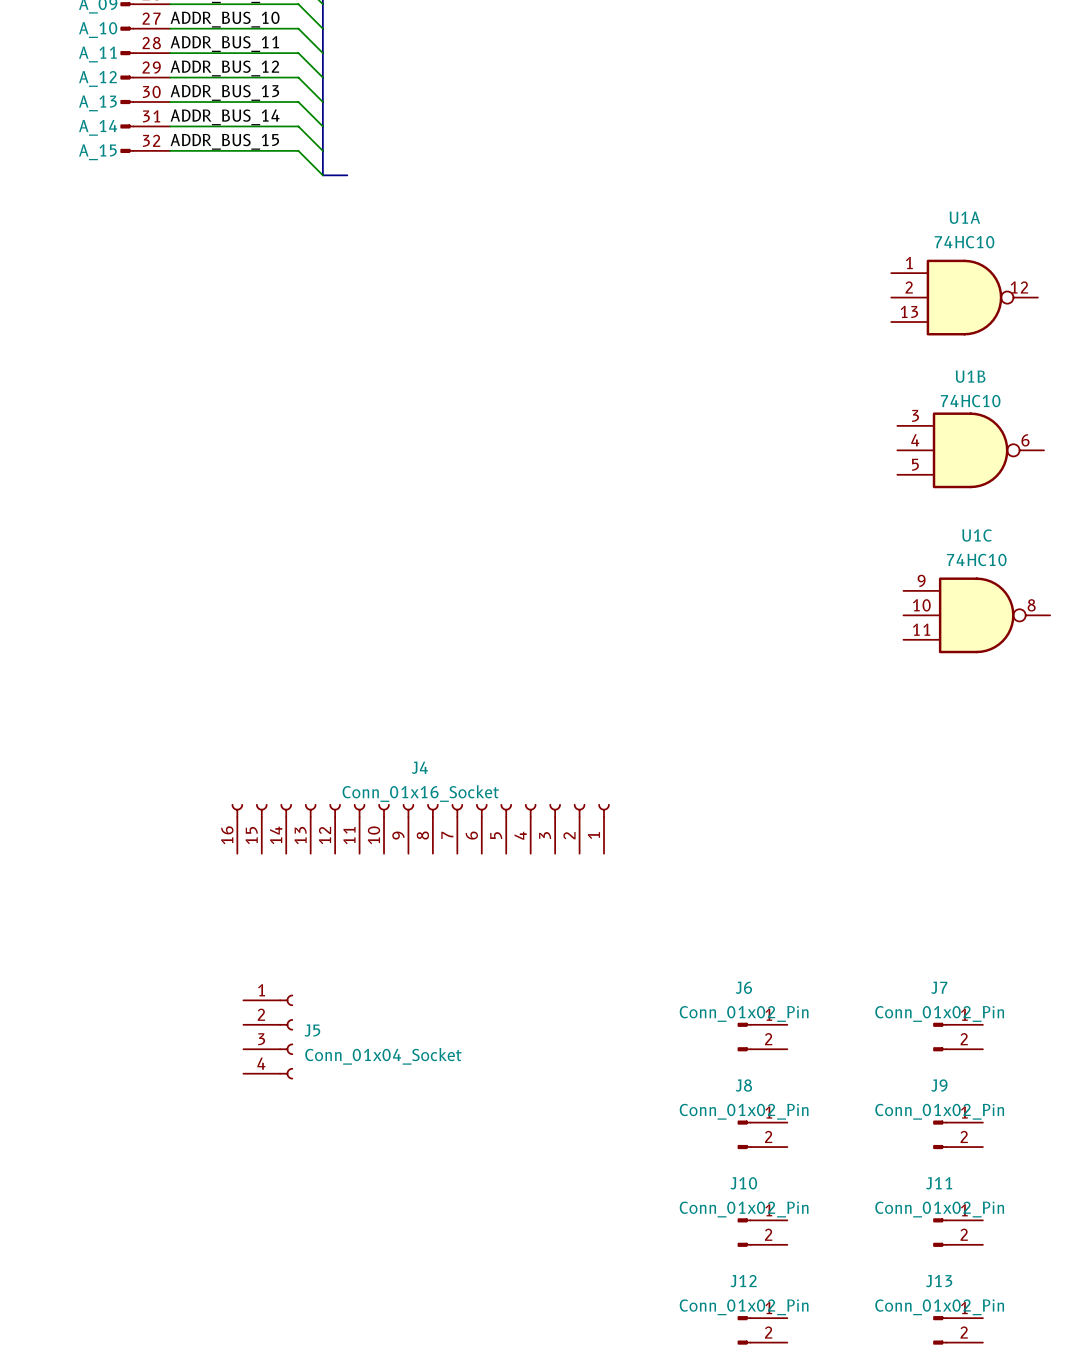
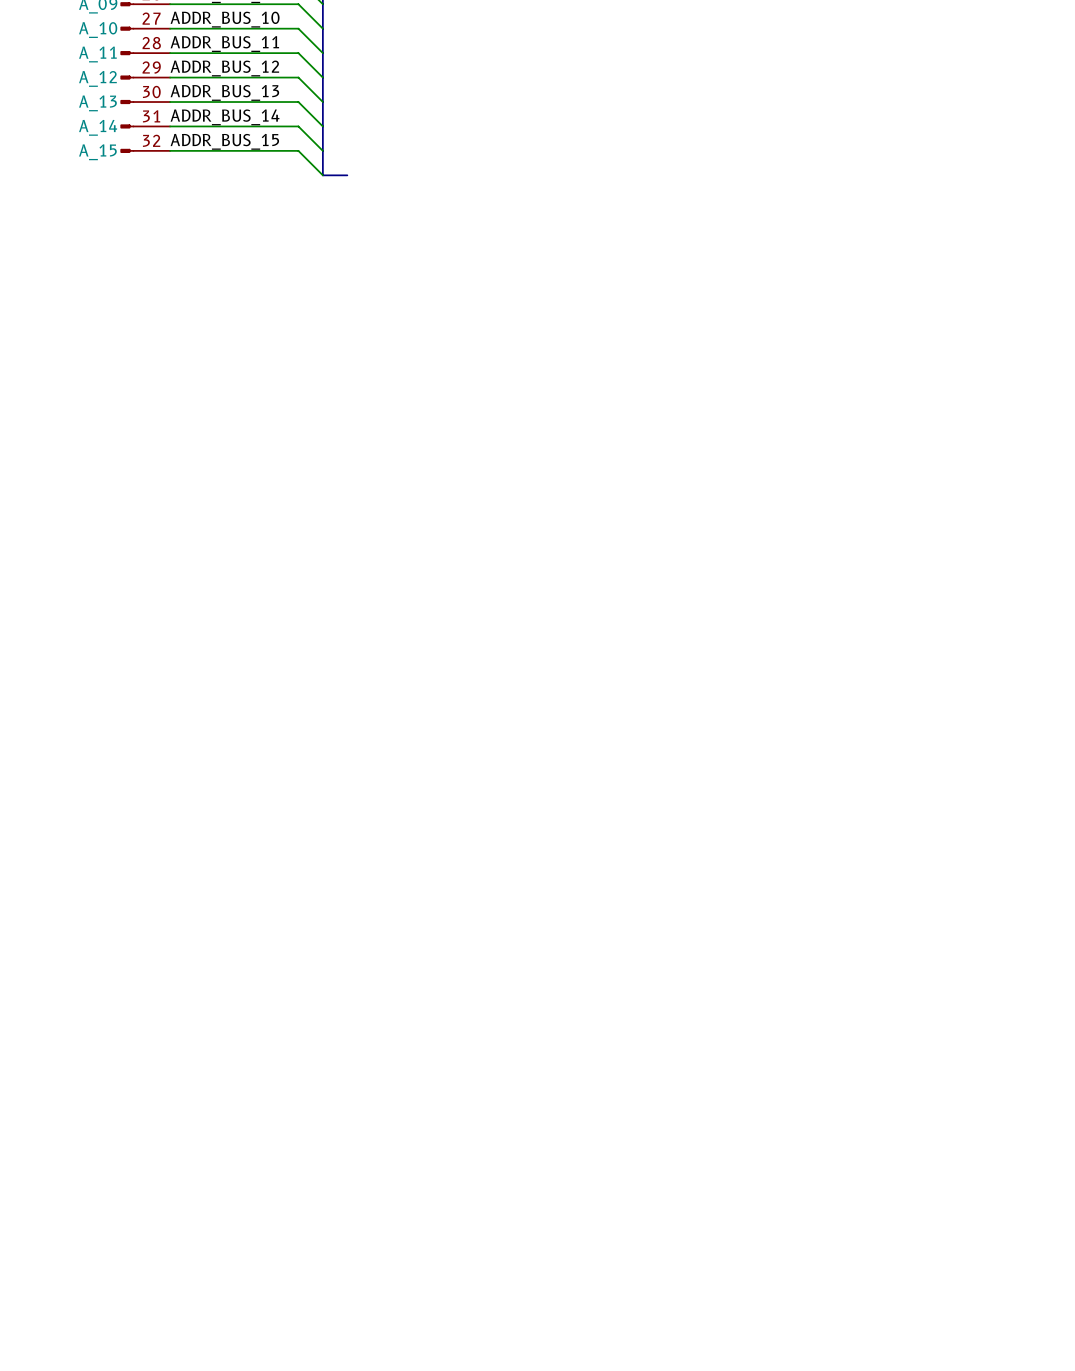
U1A: 74HC10 (964, 297) -> none
U1B: 74HC10 (970, 450) -> none
U1C: 74HC10 (976, 615) -> none
J4: Conn_01x16_Socket (420, 828) -> none
J5: Conn_01x04_Socket (268, 1037) -> none
J6: Conn_01x02_Pin (762, 1037) -> none
J7: Conn_01x02_Pin (958, 1037) -> none
J8: Conn_01x02_Pin (762, 1134) -> none
J9: Conn_01x02_Pin (958, 1134) -> none
J10: Conn_01x02_Pin (762, 1232) -> none
J11: Conn_01x02_Pin (958, 1232) -> none
J12: Conn_01x02_Pin (762, 1330) -> none
J13: Conn_01x02_Pin (958, 1330) -> none

